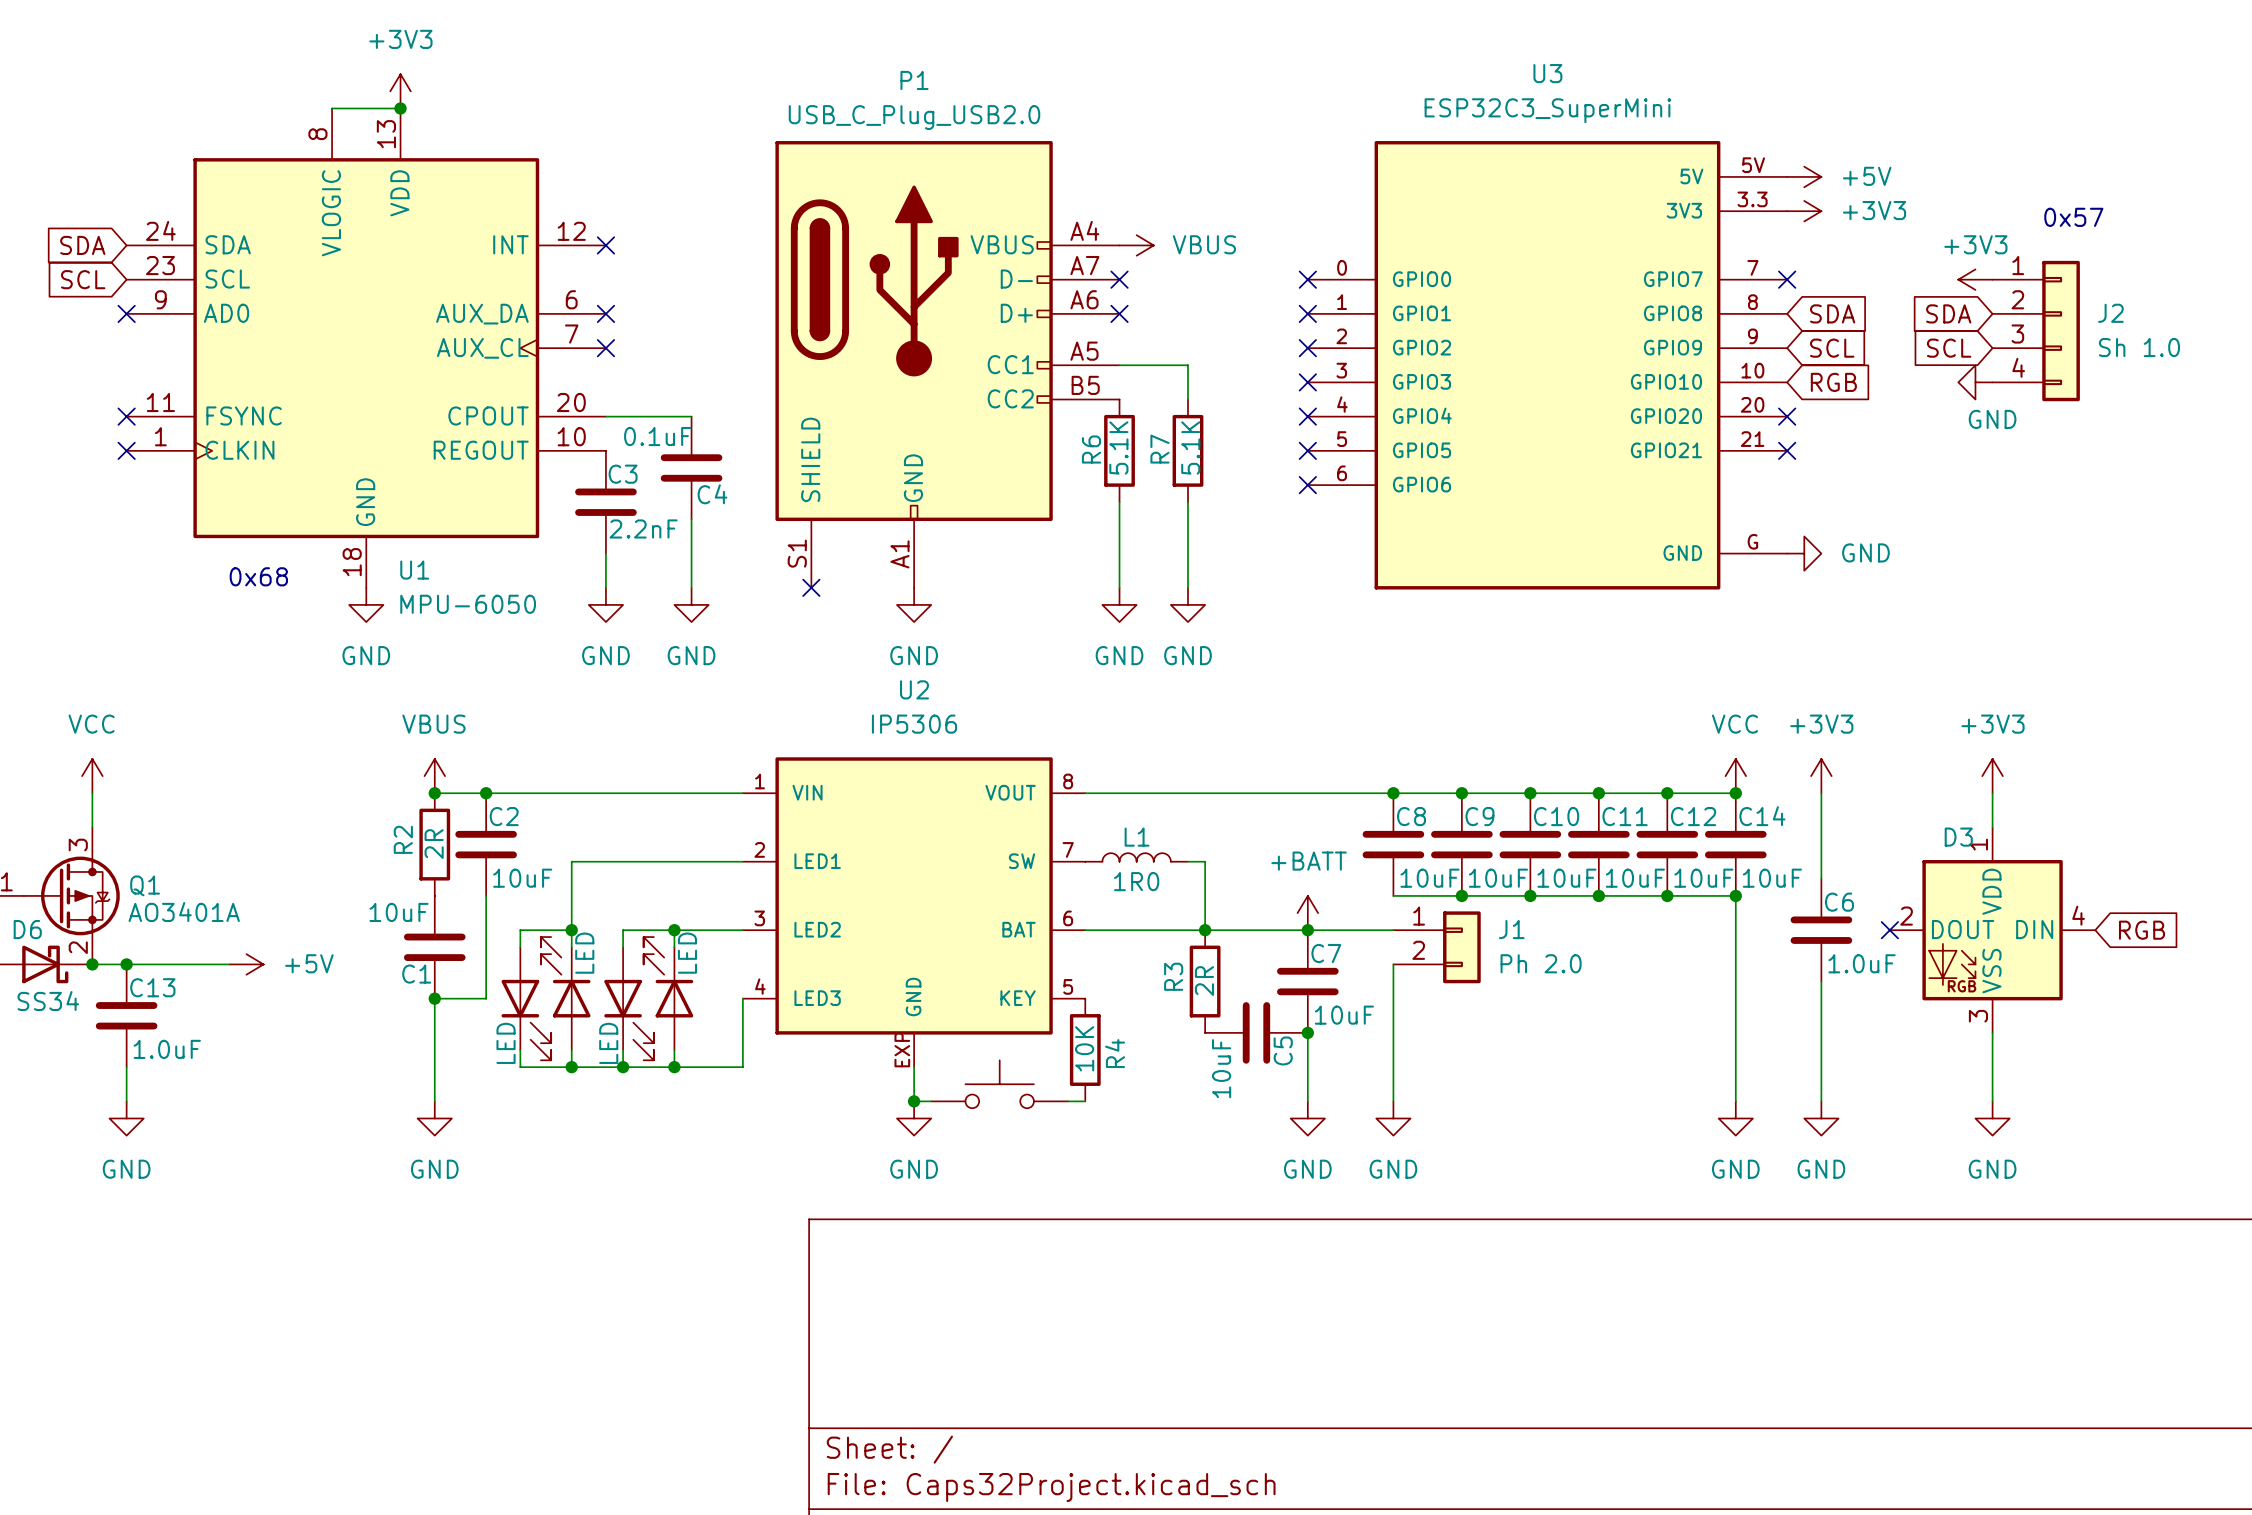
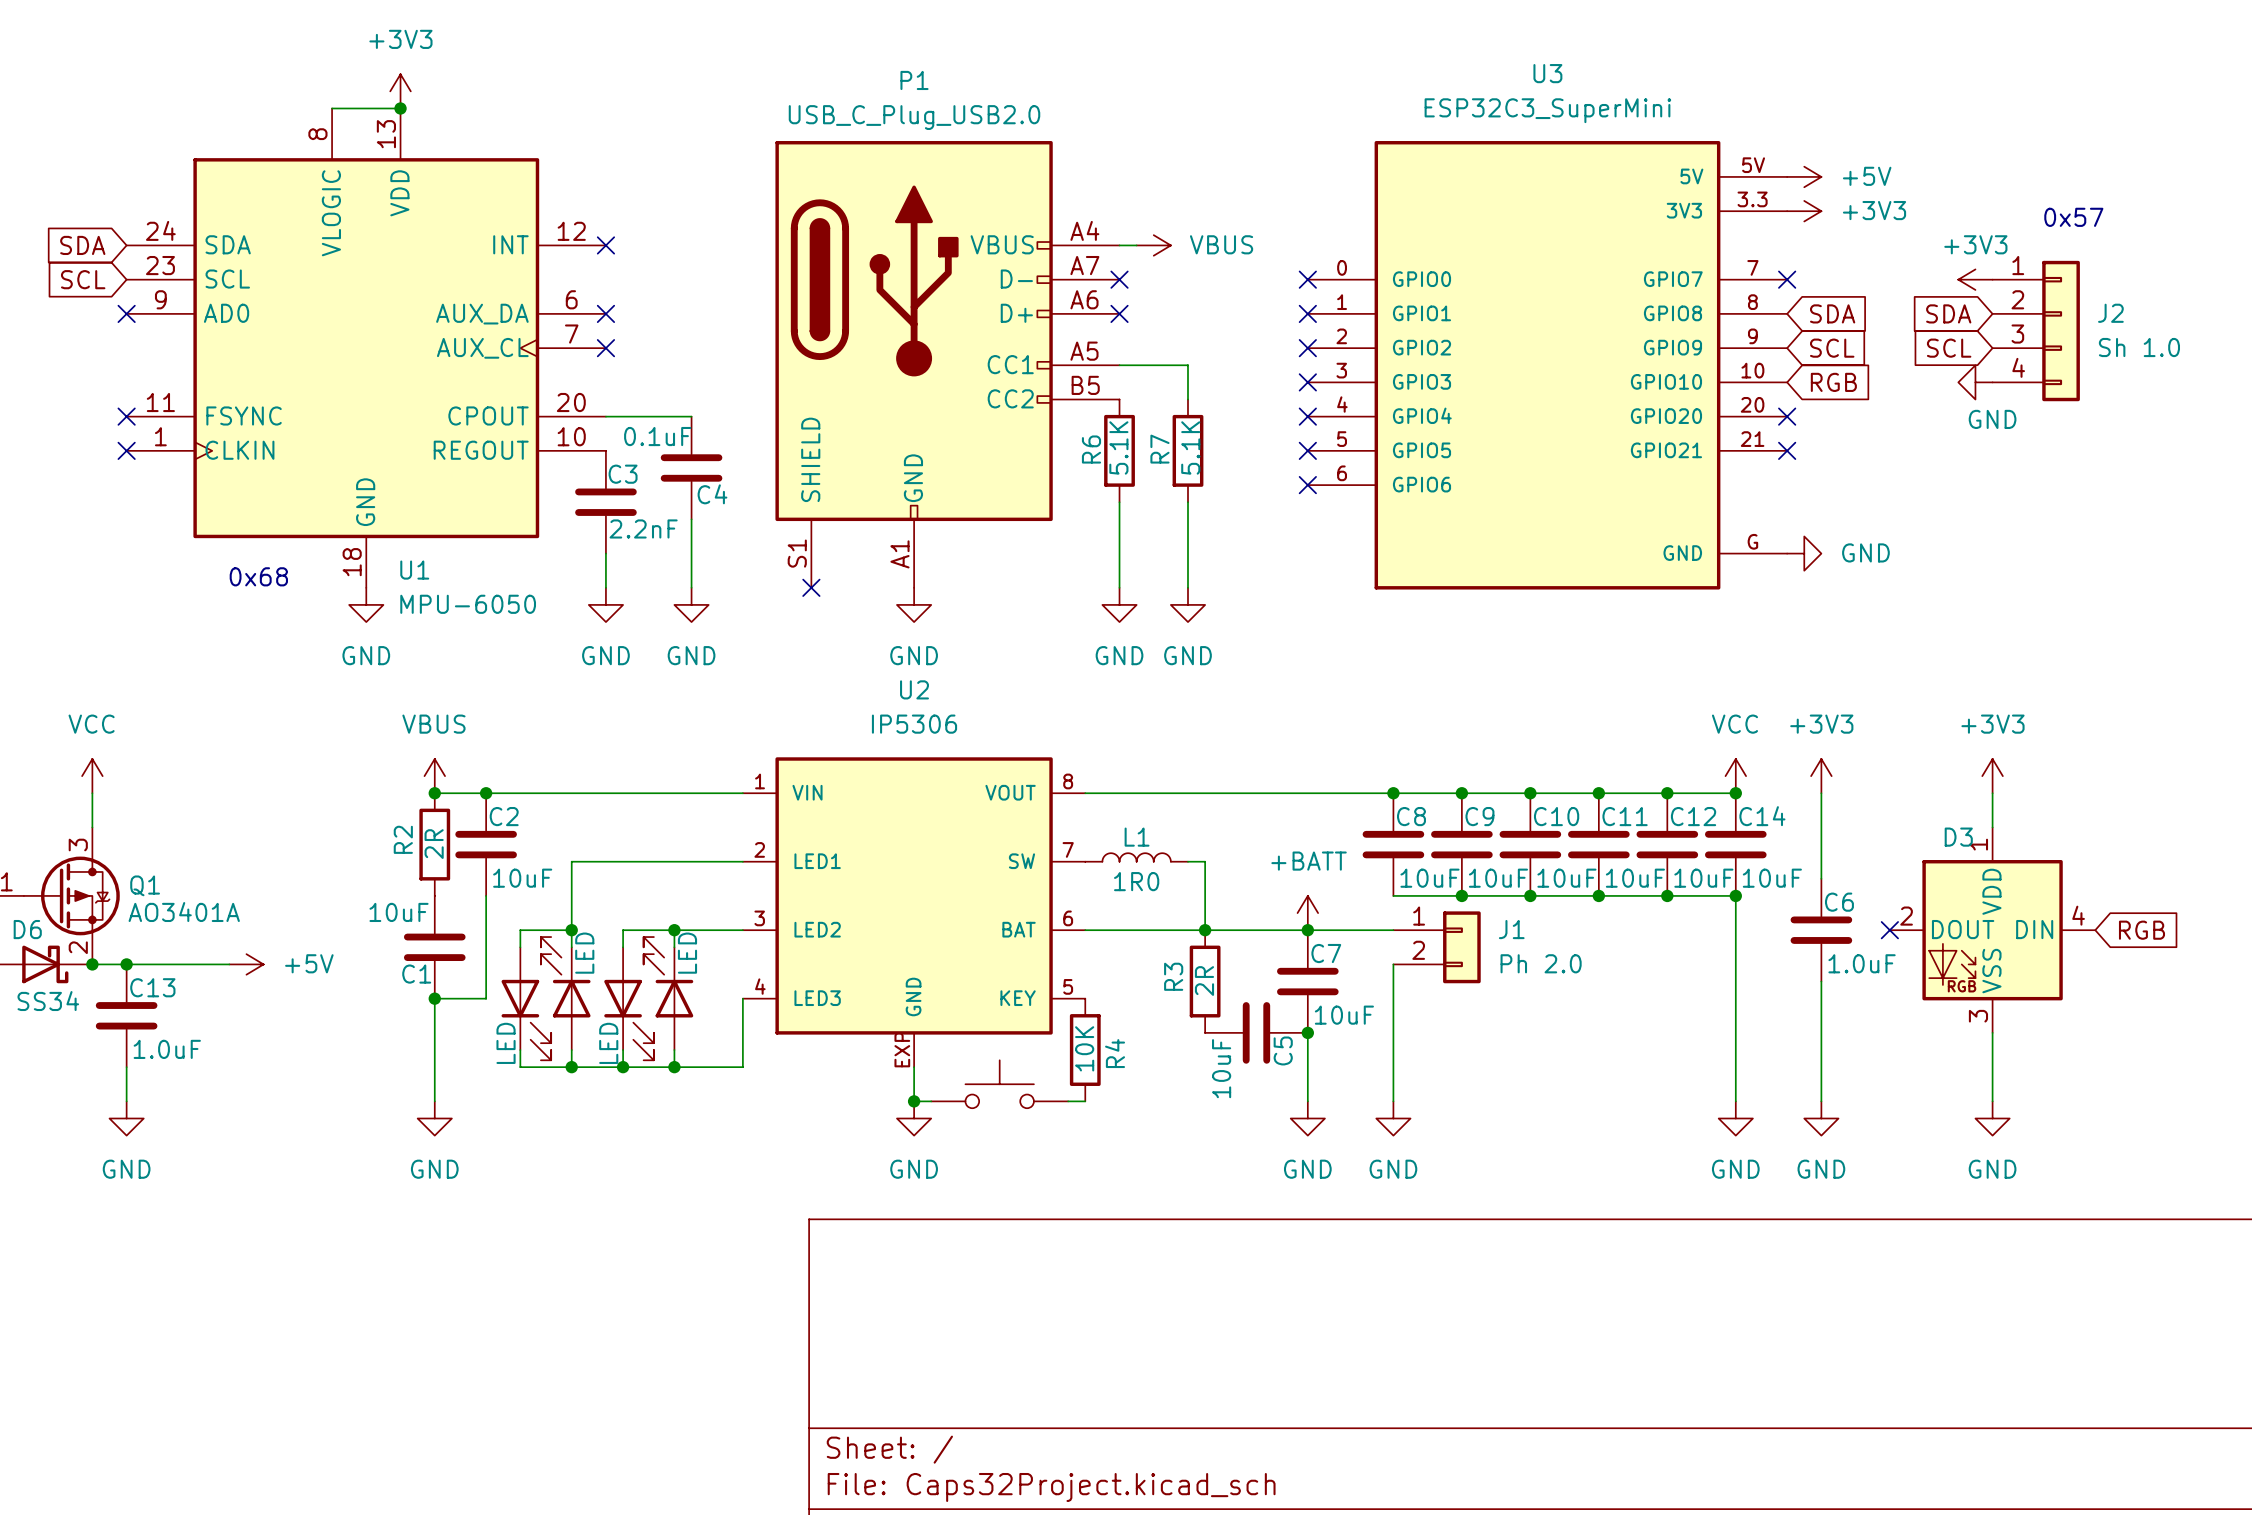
power symbol position: VBUS (1136, 245) -> VBUS (1153, 245)

